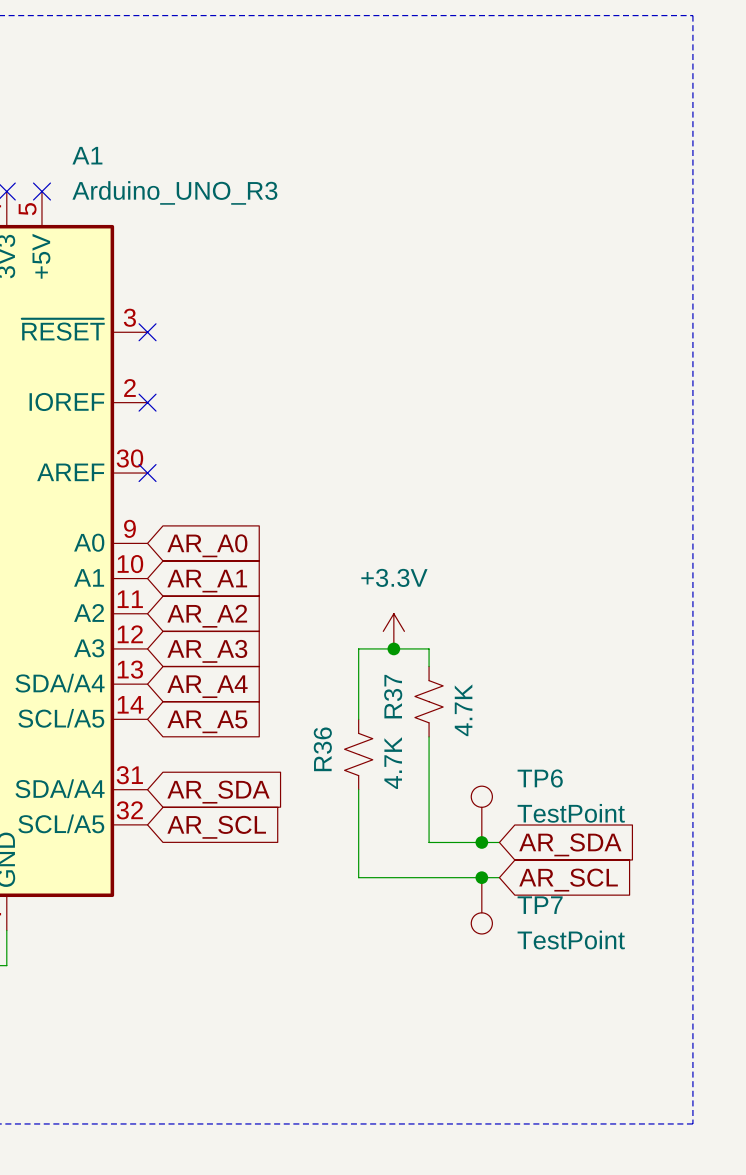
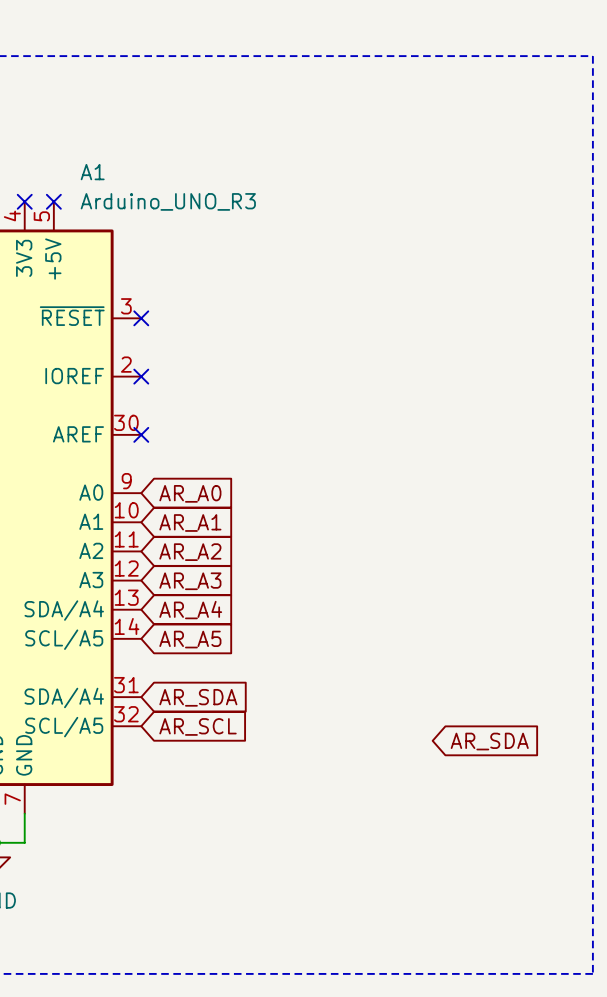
power symbol: +3.3V (393, 631) -> none
junction: (393, 648) -> none
wire: (429, 666) (429, 648) (358, 648) (358, 719) -> none
R37: 4.7K (429, 701) -> none
wire: (429, 736) (429, 842) (499, 842) -> none
R36: 4.7K (358, 754) -> none
wire: (358, 789) (358, 877) (499, 877) -> none
TP6: TestPoint (481, 814) -> none
junction: (481, 842) -> none
junction: (481, 877) -> none
global label: AR_SCL (568, 880) -> none
TP7: TestPoint (481, 905) -> none

